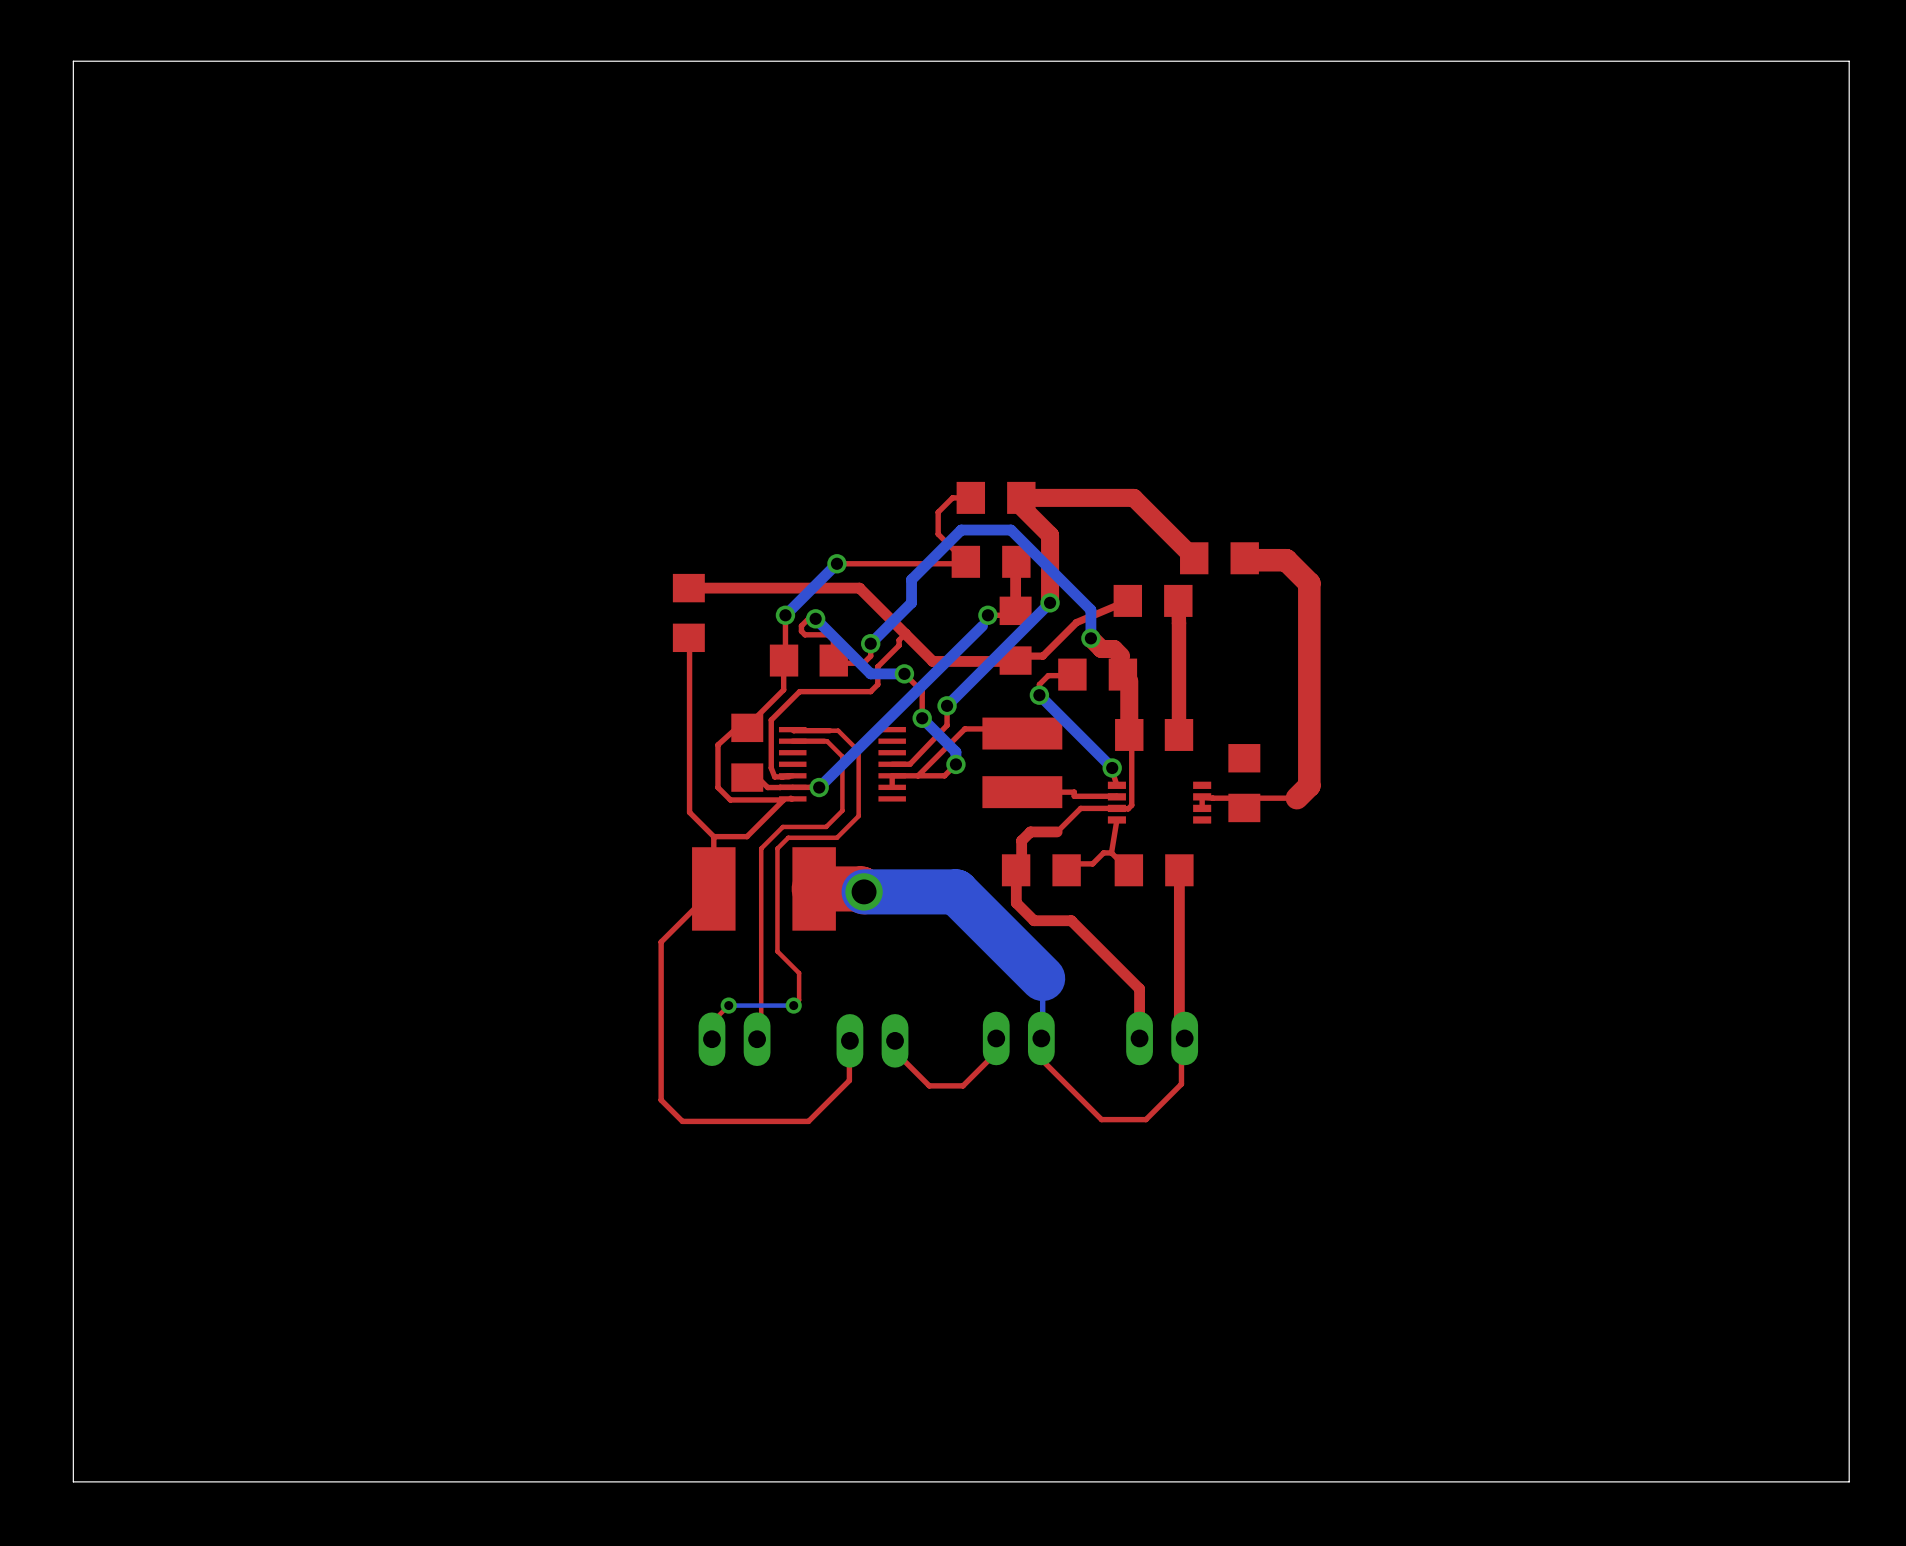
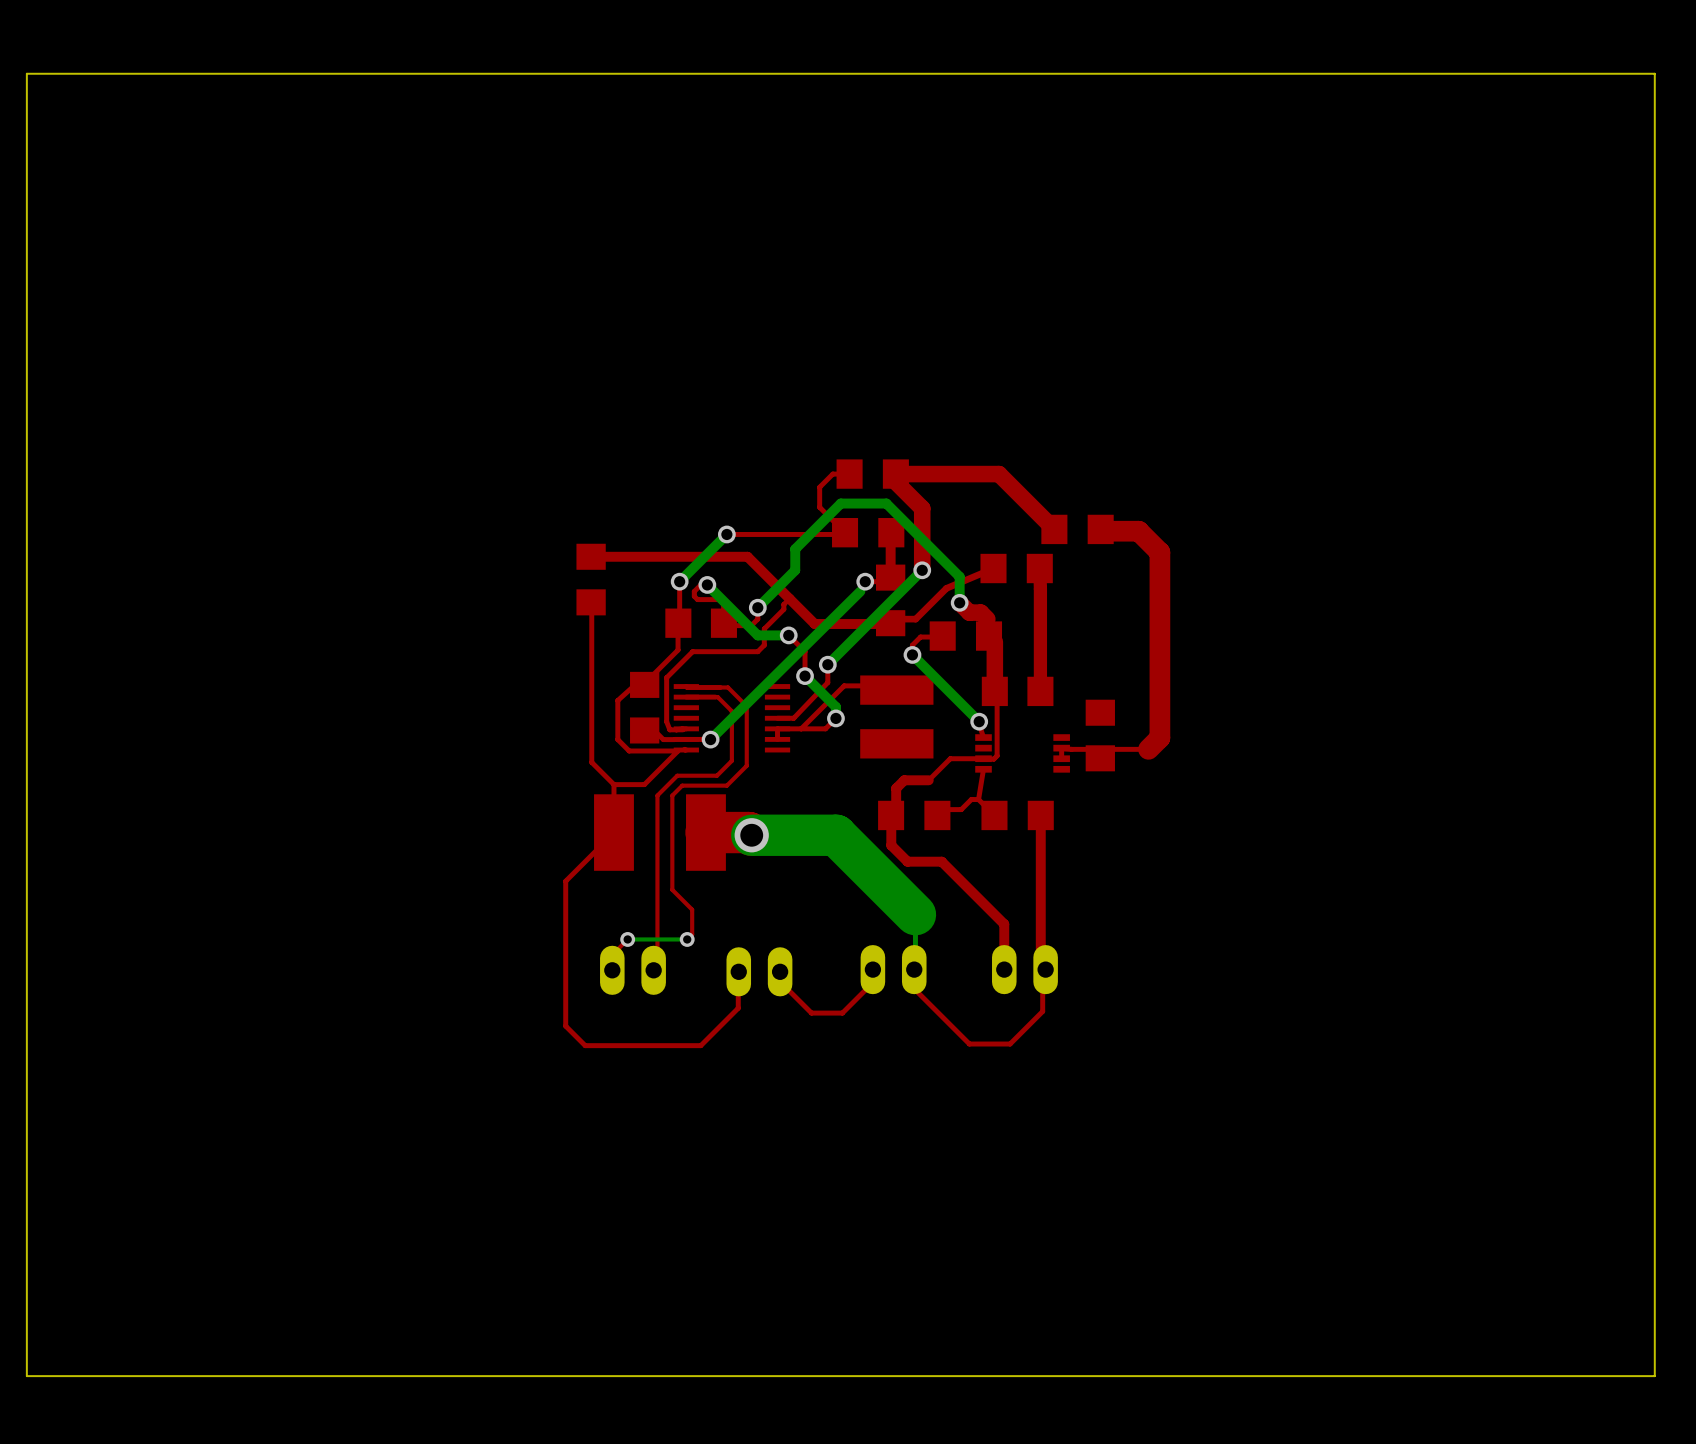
top track: (1022, 792) (1074, 792) (1074, 796) (1116, 796) -> none

